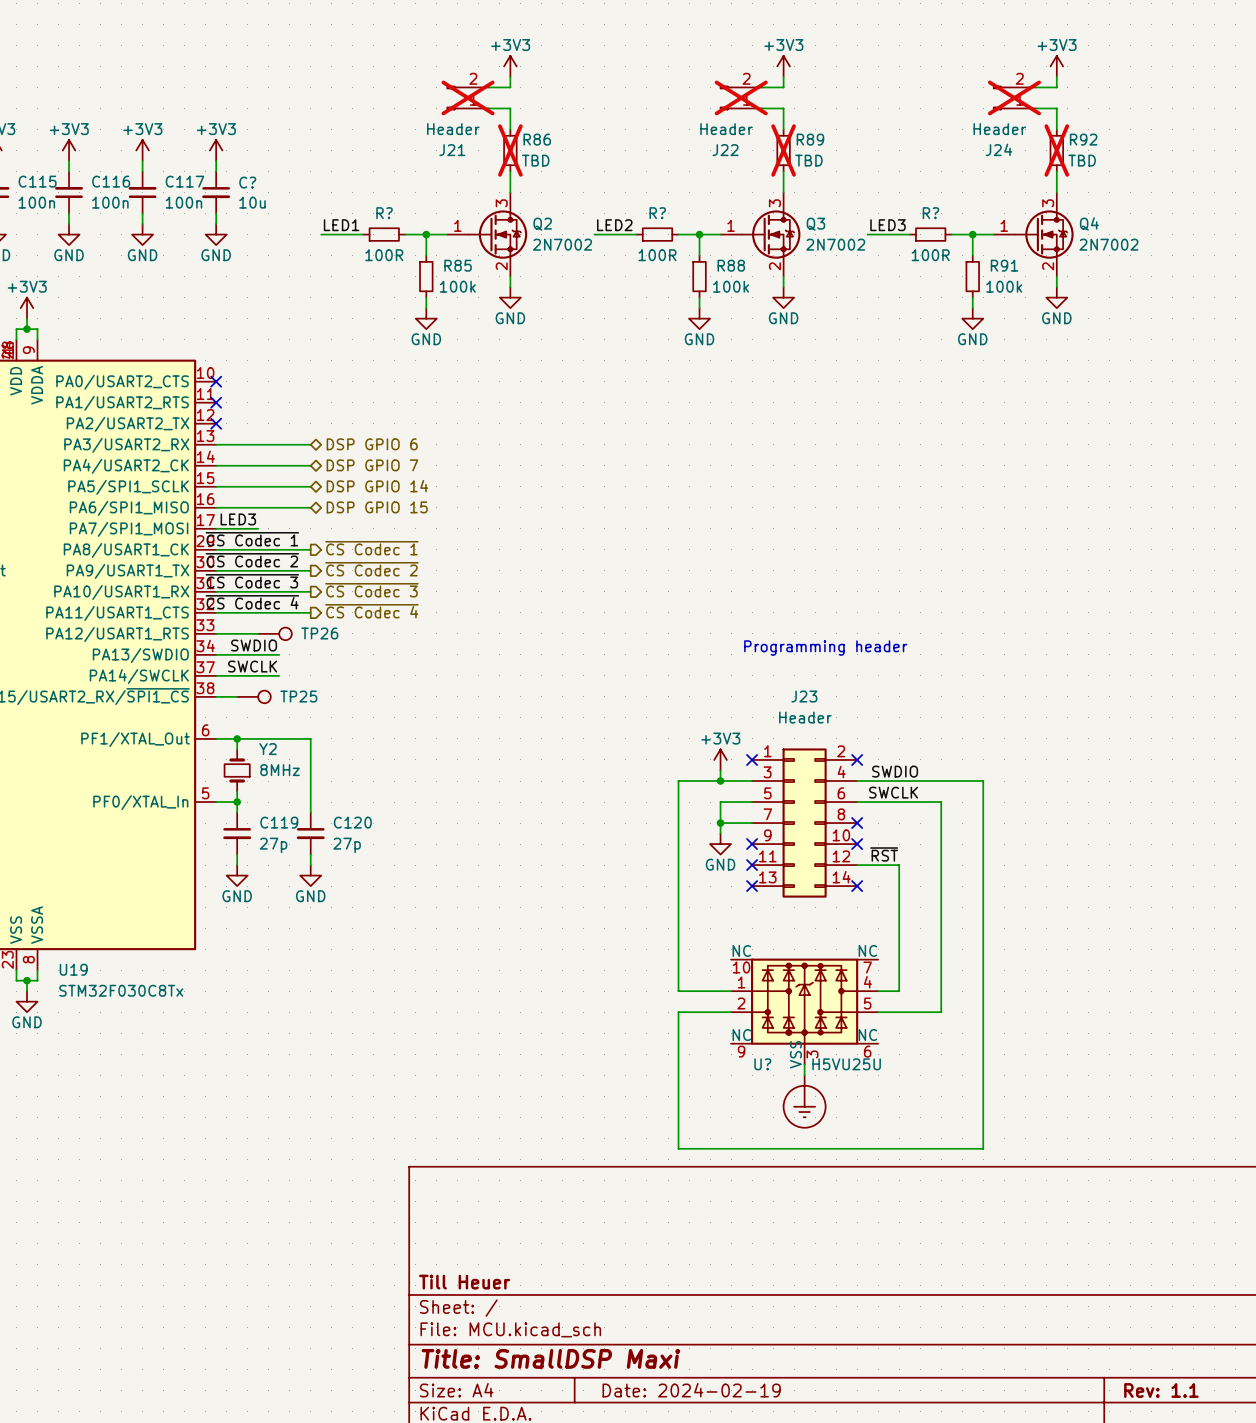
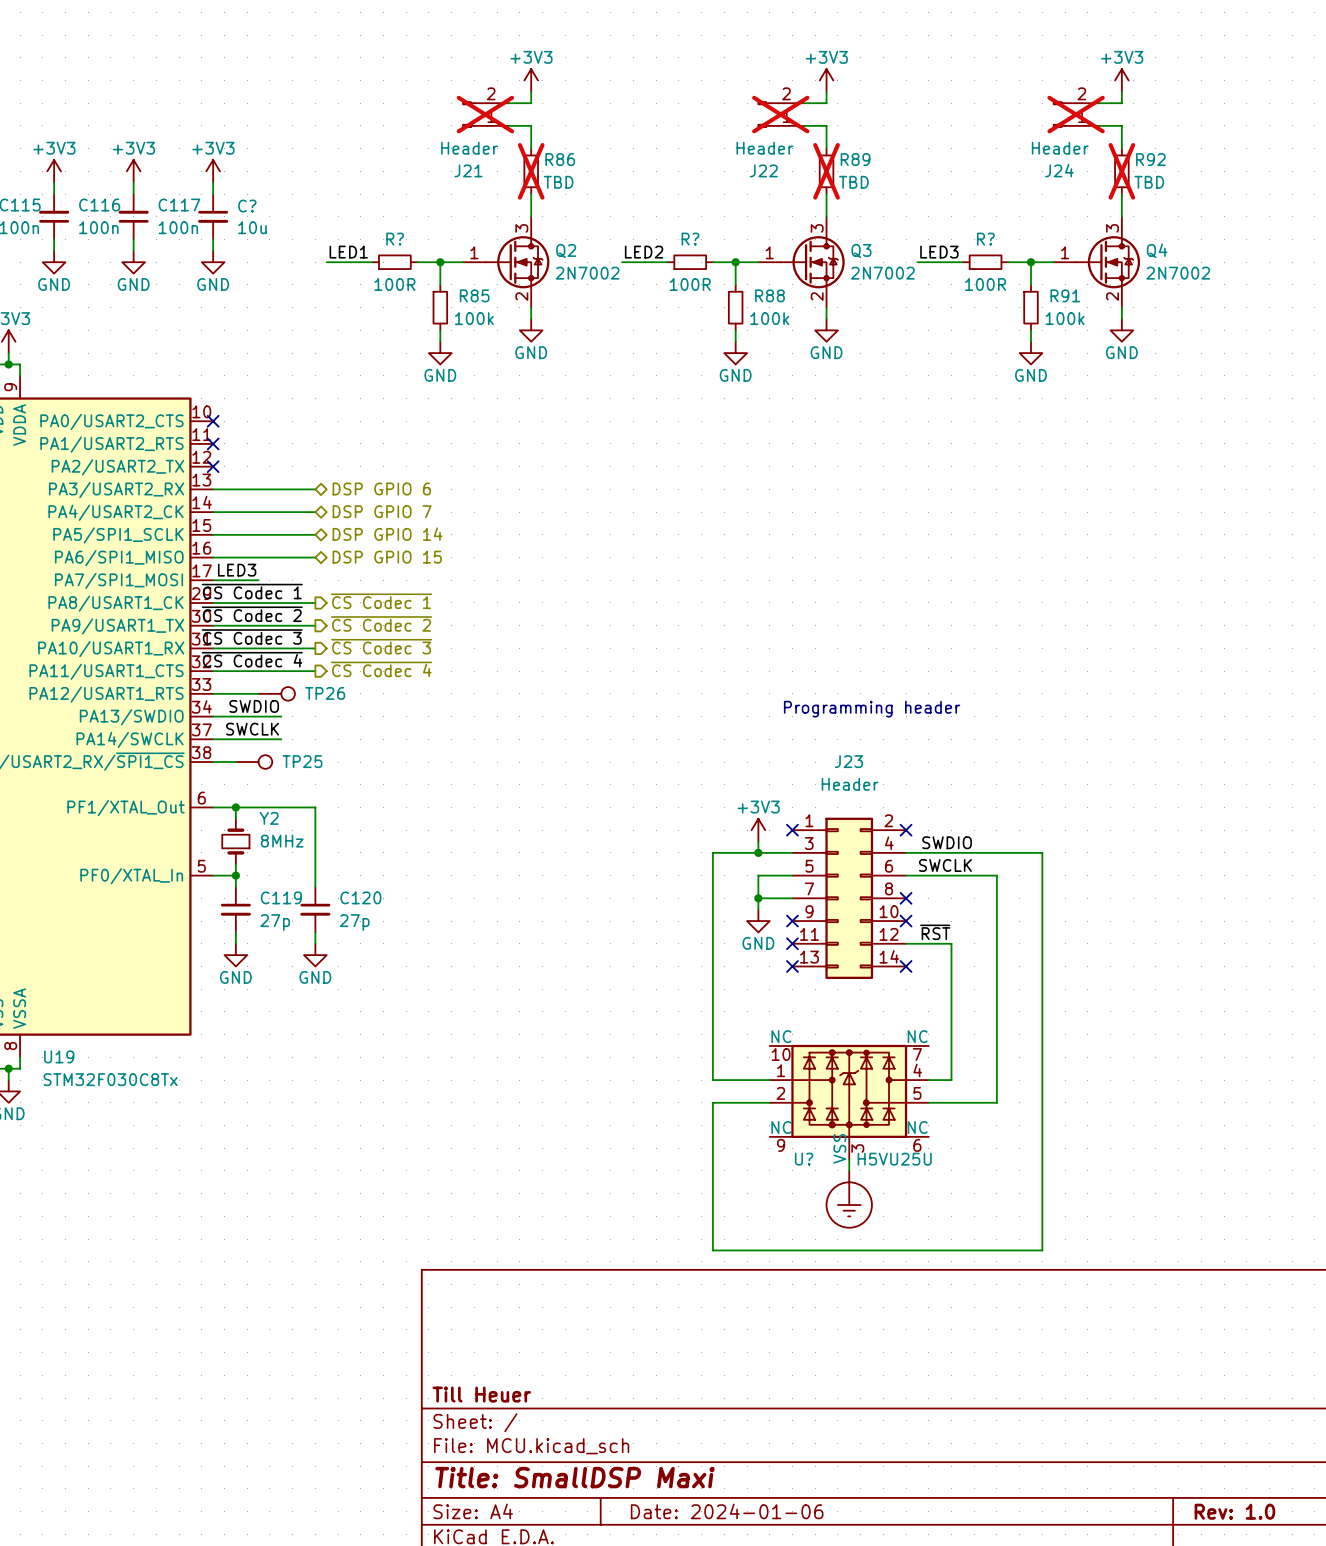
title block: Date: 2024-02-19 (691, 1390) -> Date: 2024-01-06 (727, 1511)
title block: Rev: 1.1 (1161, 1390) -> Rev: 1.0 (1234, 1511)

